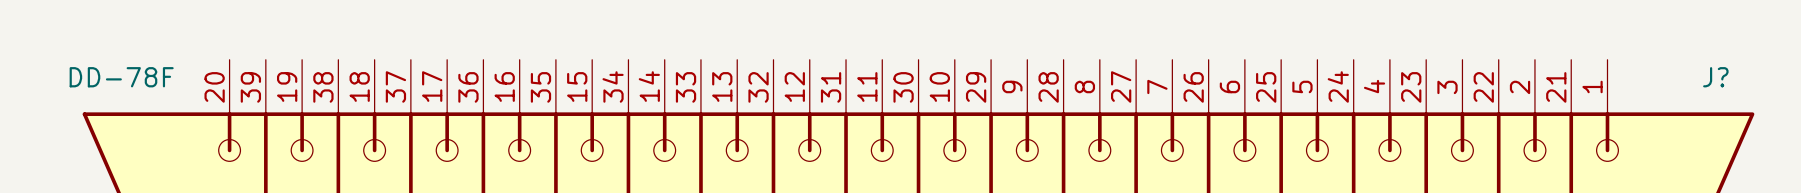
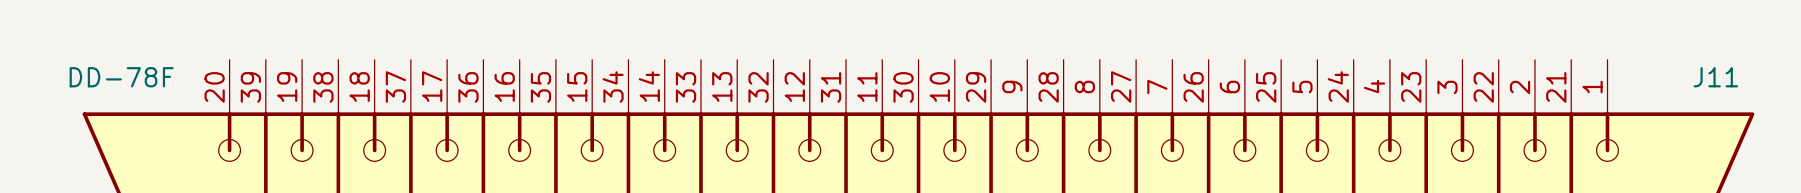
J? name: J? (1715, 77) -> J11 (1715, 77)

